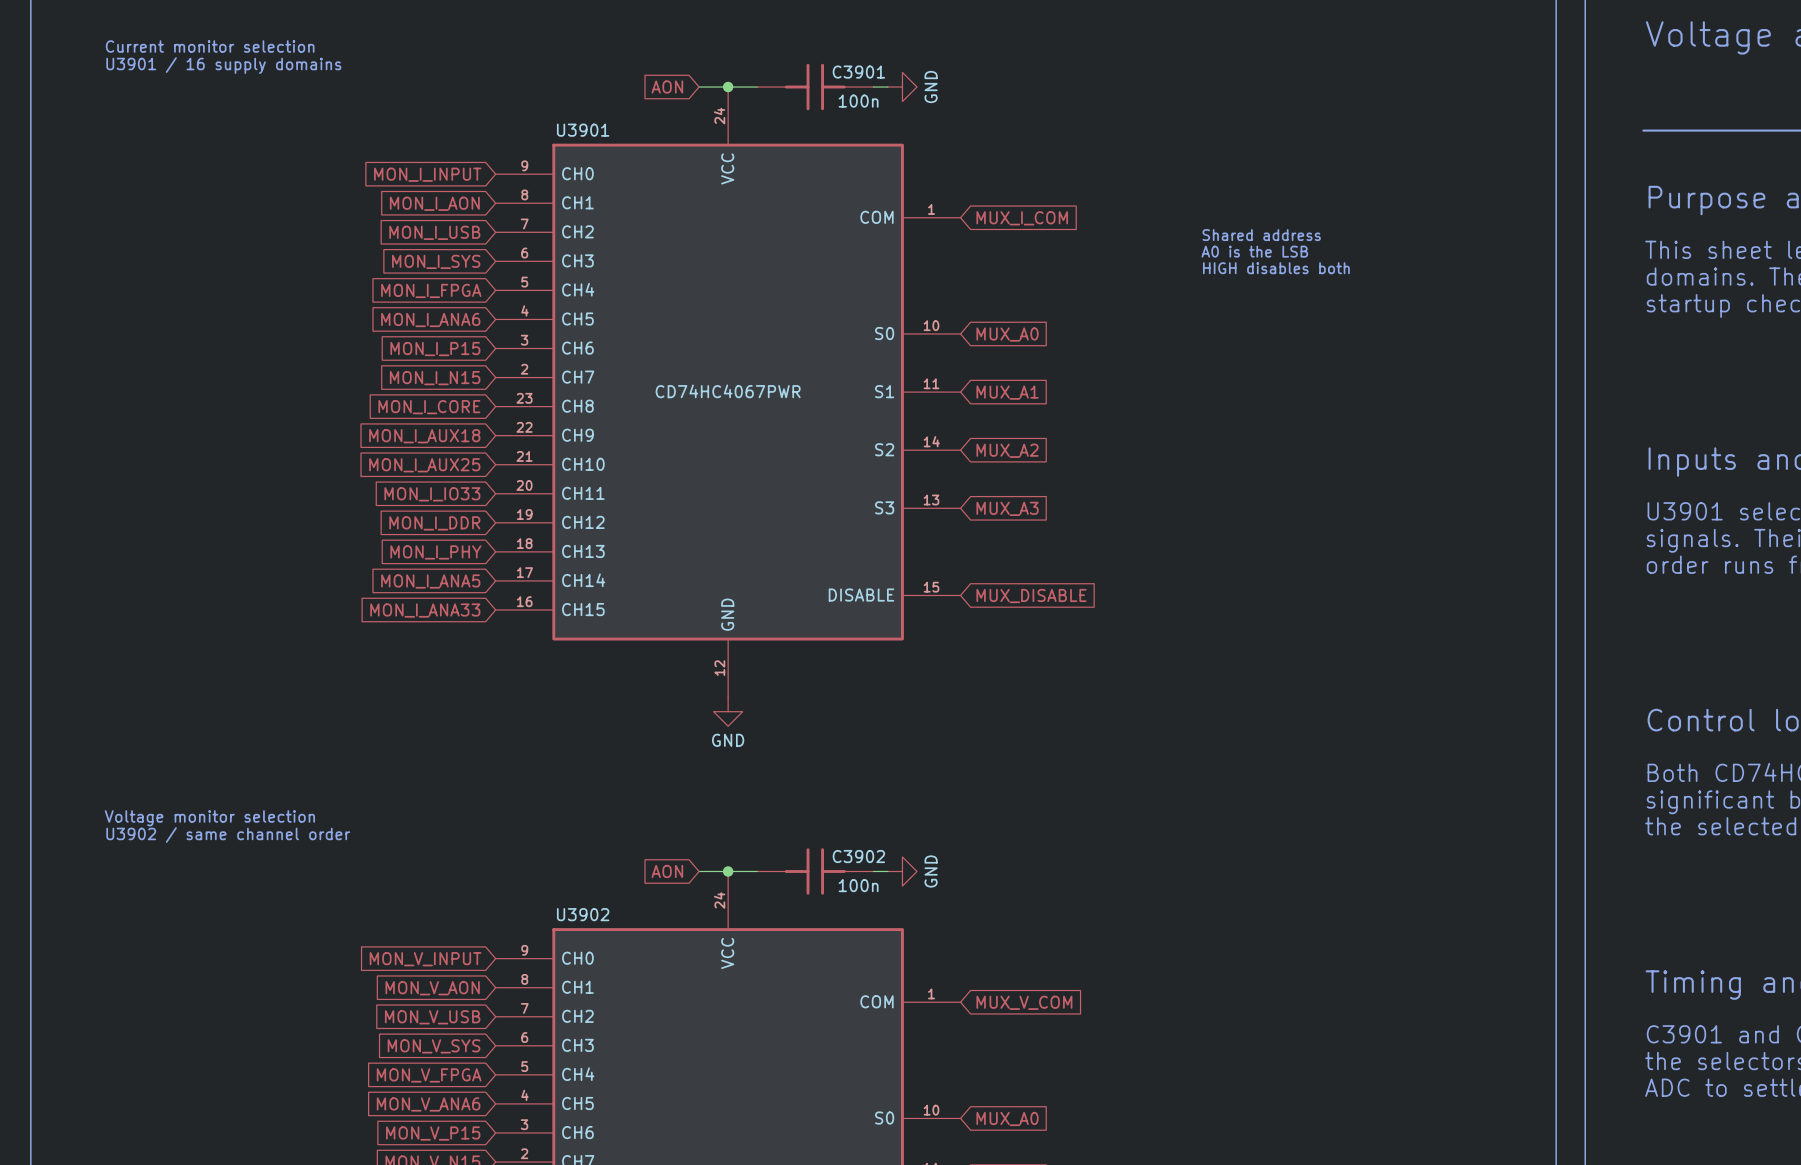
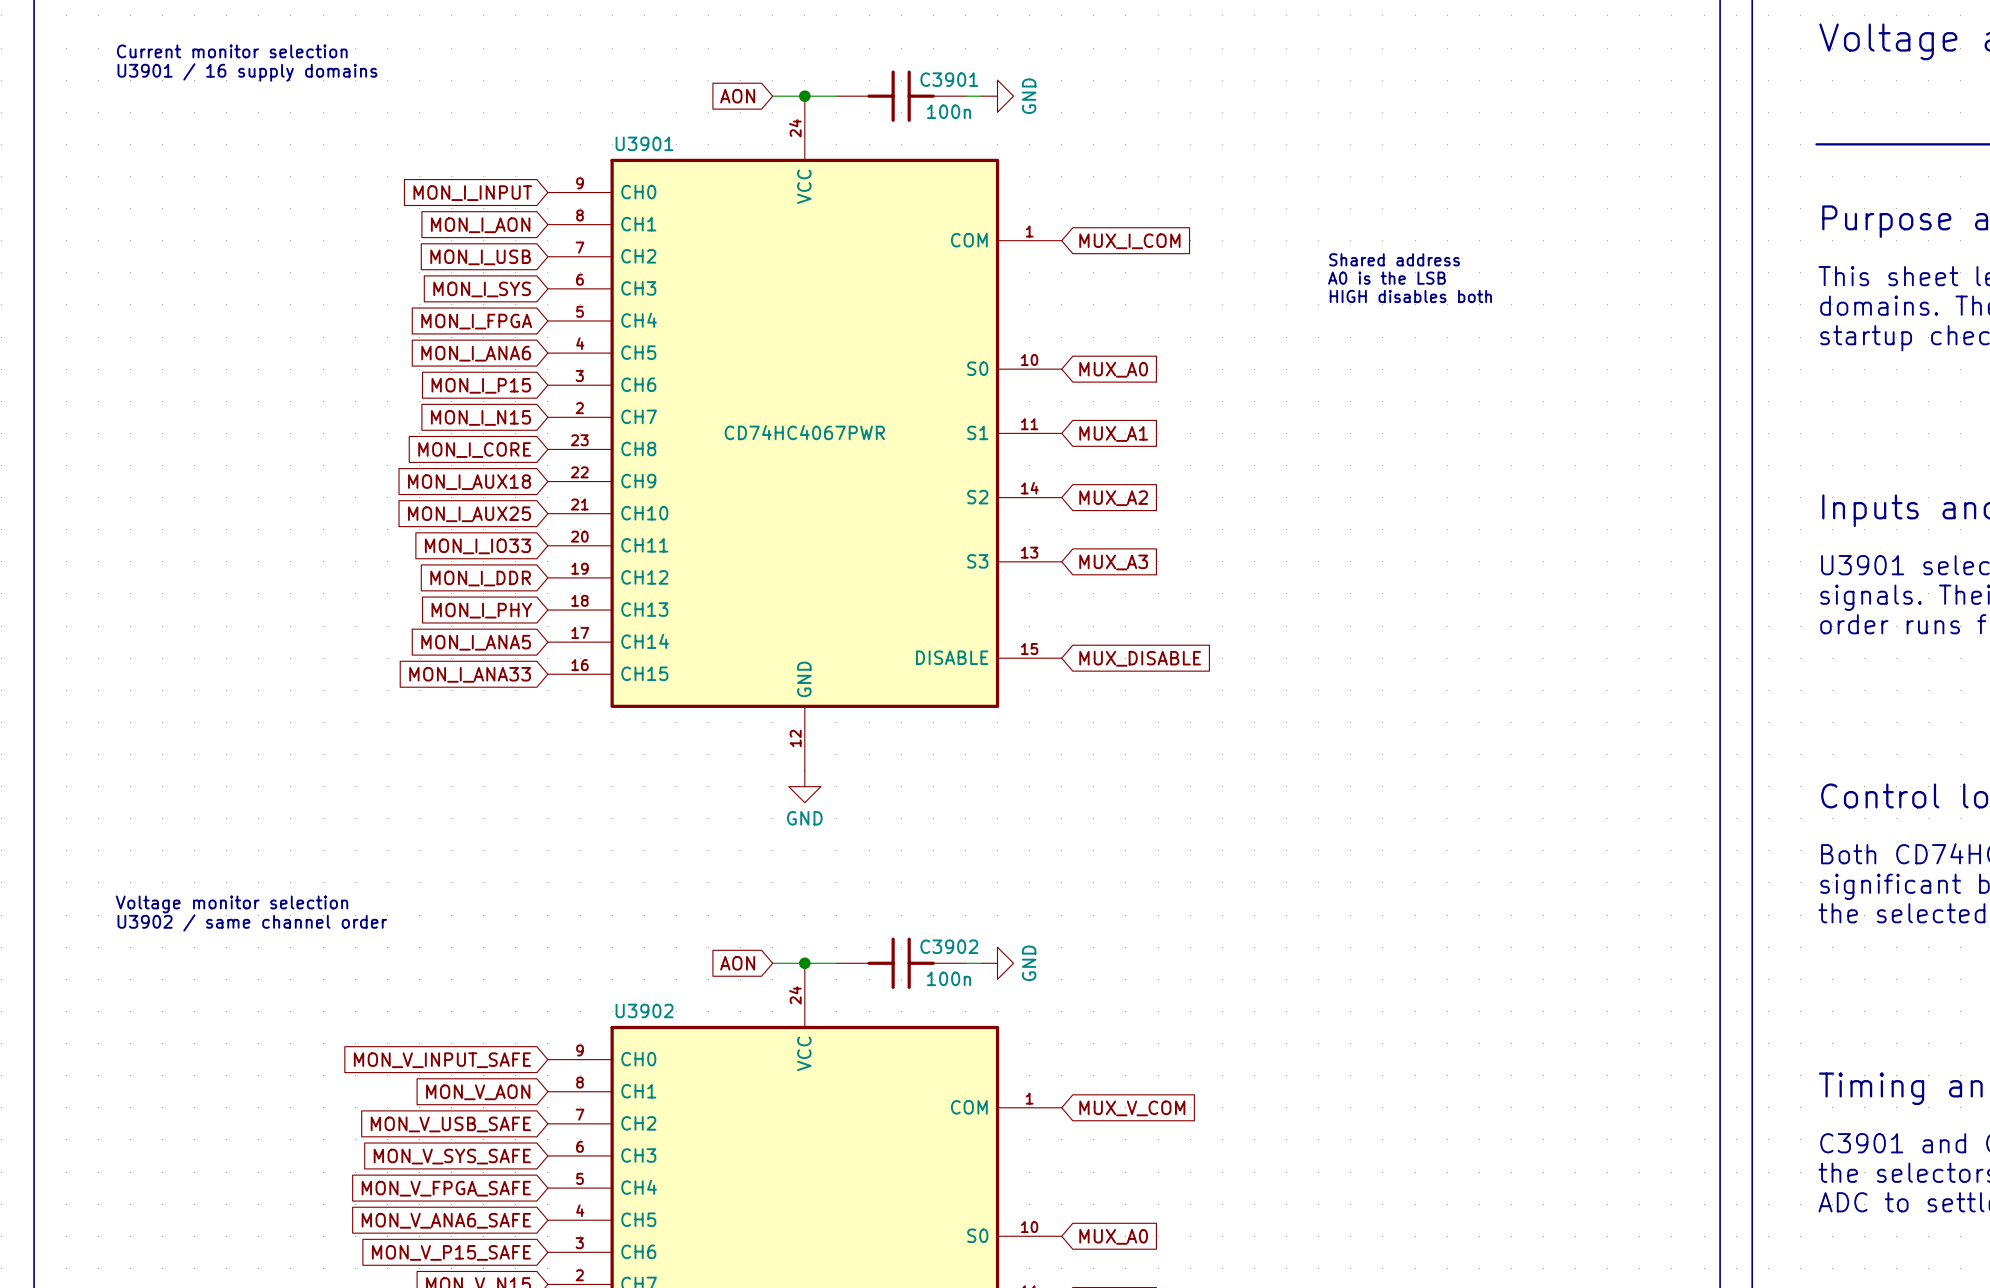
global label: MON_V_INPUT (425, 959) -> MON_V_INPUT_SAFE (442, 1060)
global label: MON_V_USB (432, 1017) -> MON_V_USB_SAFE (450, 1124)
global label: MON_V_SYS (434, 1046) -> MON_V_SYS_SAFE (452, 1156)
global label: MON_V_FPGA (429, 1075) -> MON_V_FPGA_SAFE (446, 1188)
global label: MON_V_ANA6 (428, 1104) -> MON_V_ANA6_SAFE (446, 1220)
global label: MON_V_P15 (433, 1133) -> MON_V_P15_SAFE (451, 1252)

